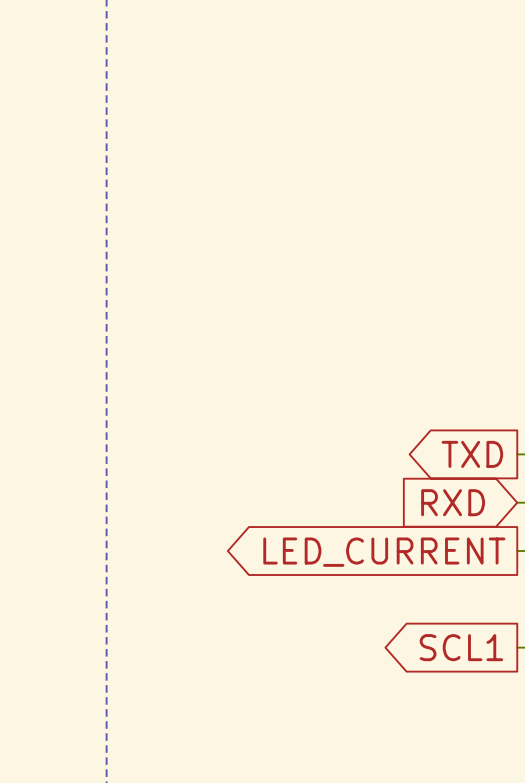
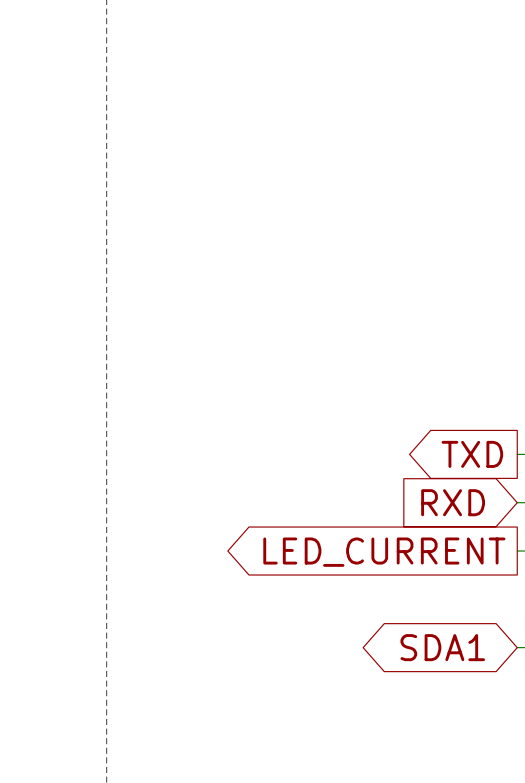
global label shape: output (461, 647) -> bidirectional (442, 647)
global label: SCL1 (461, 647) -> SDA1 (442, 647)

